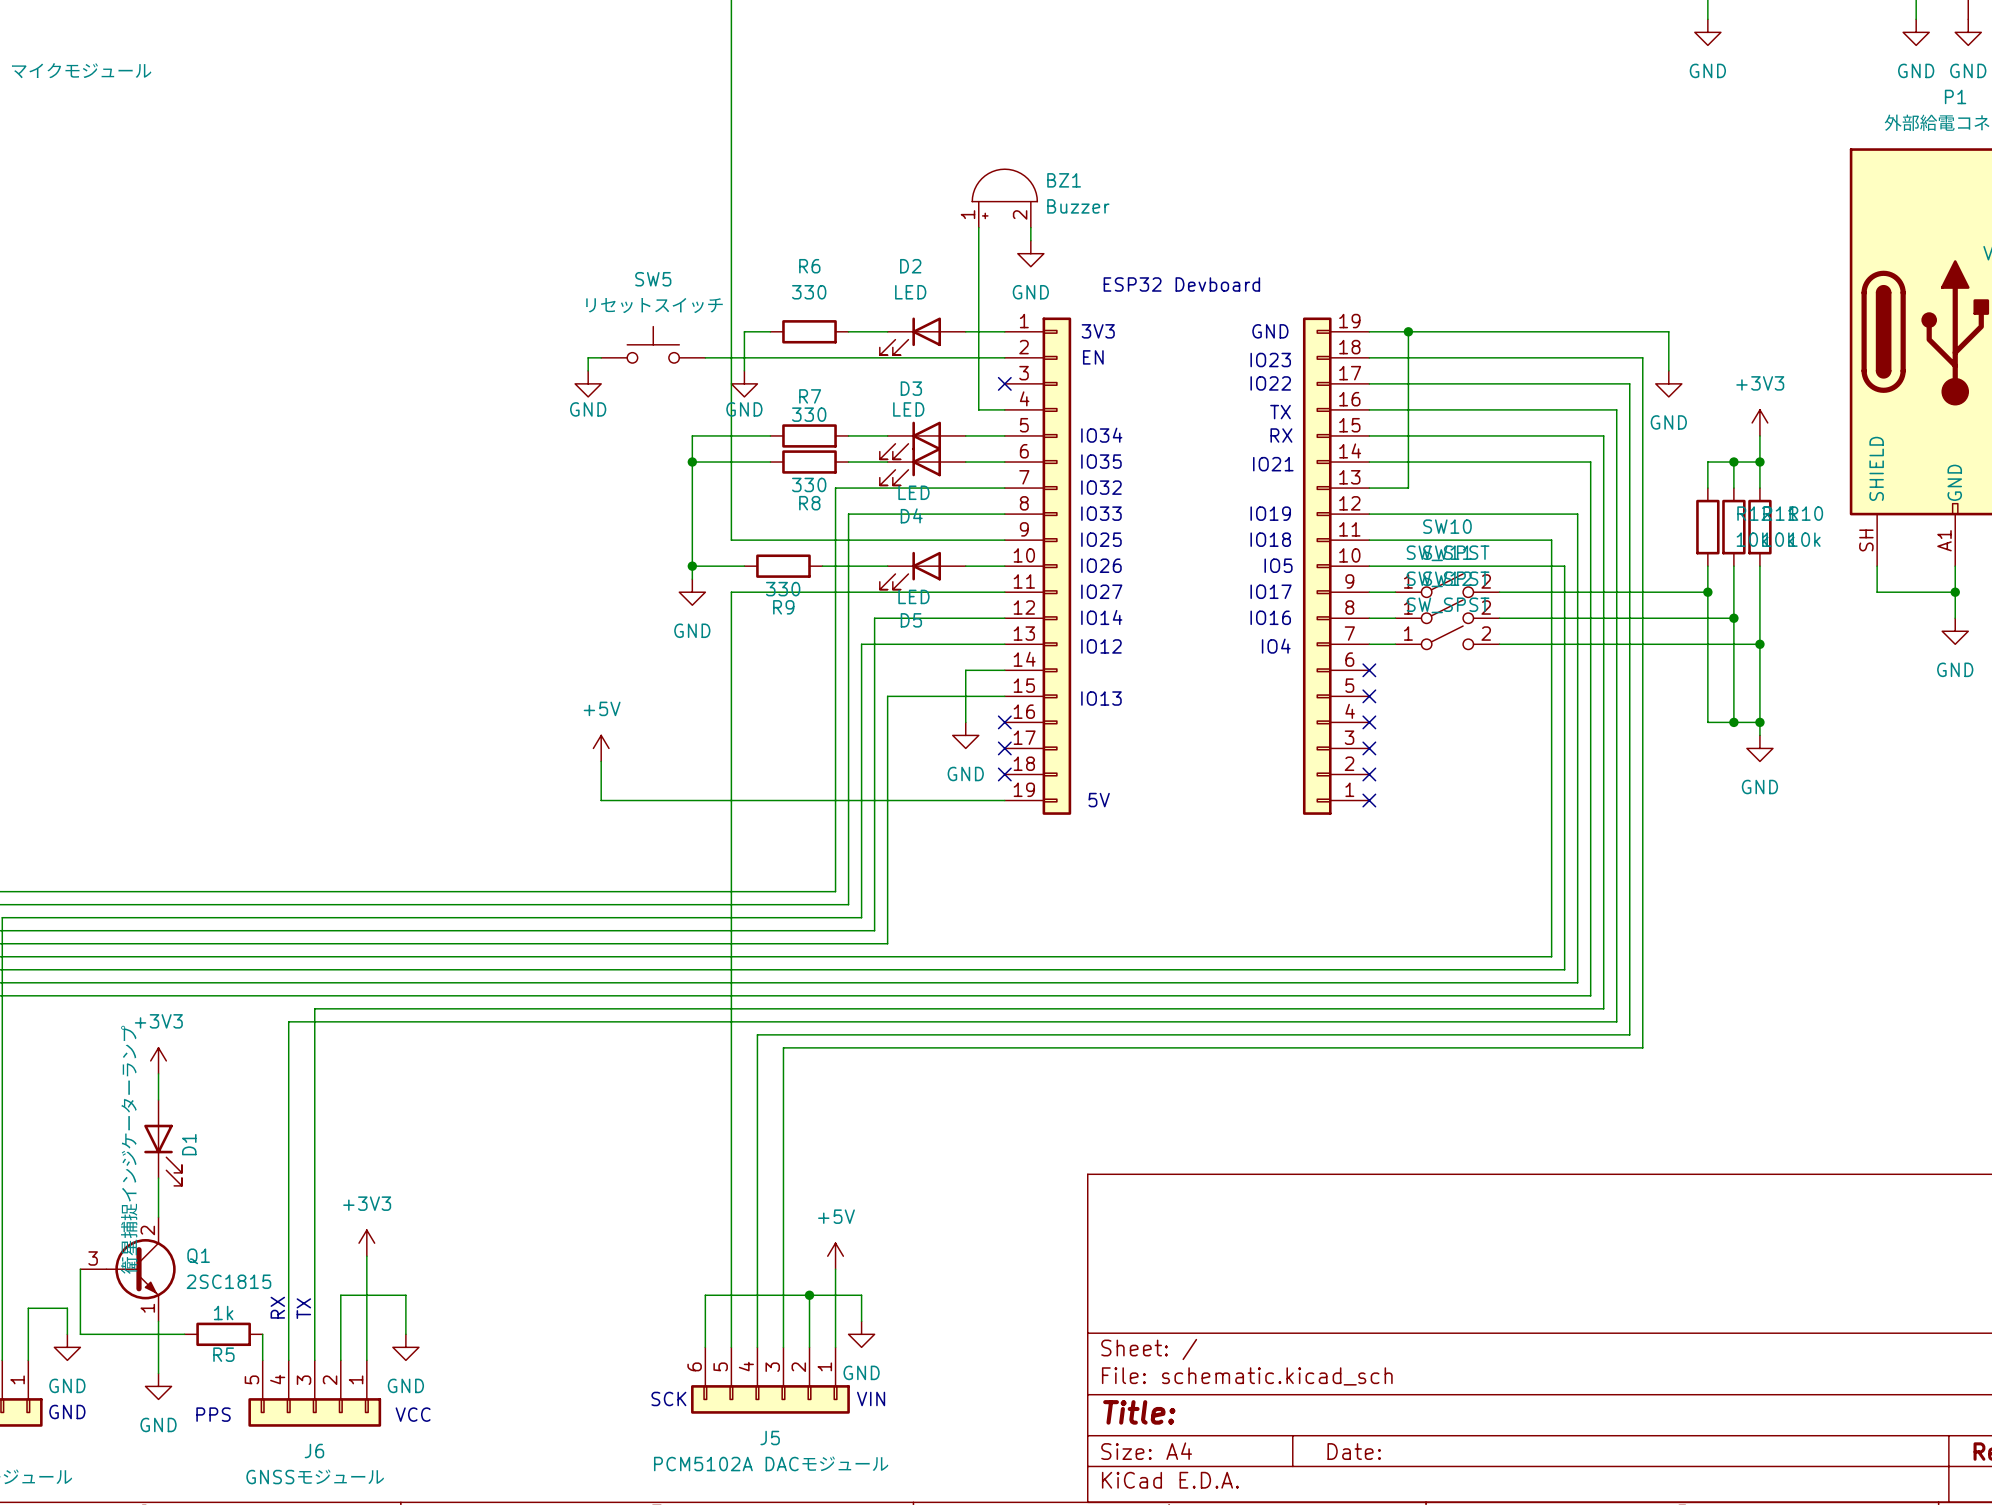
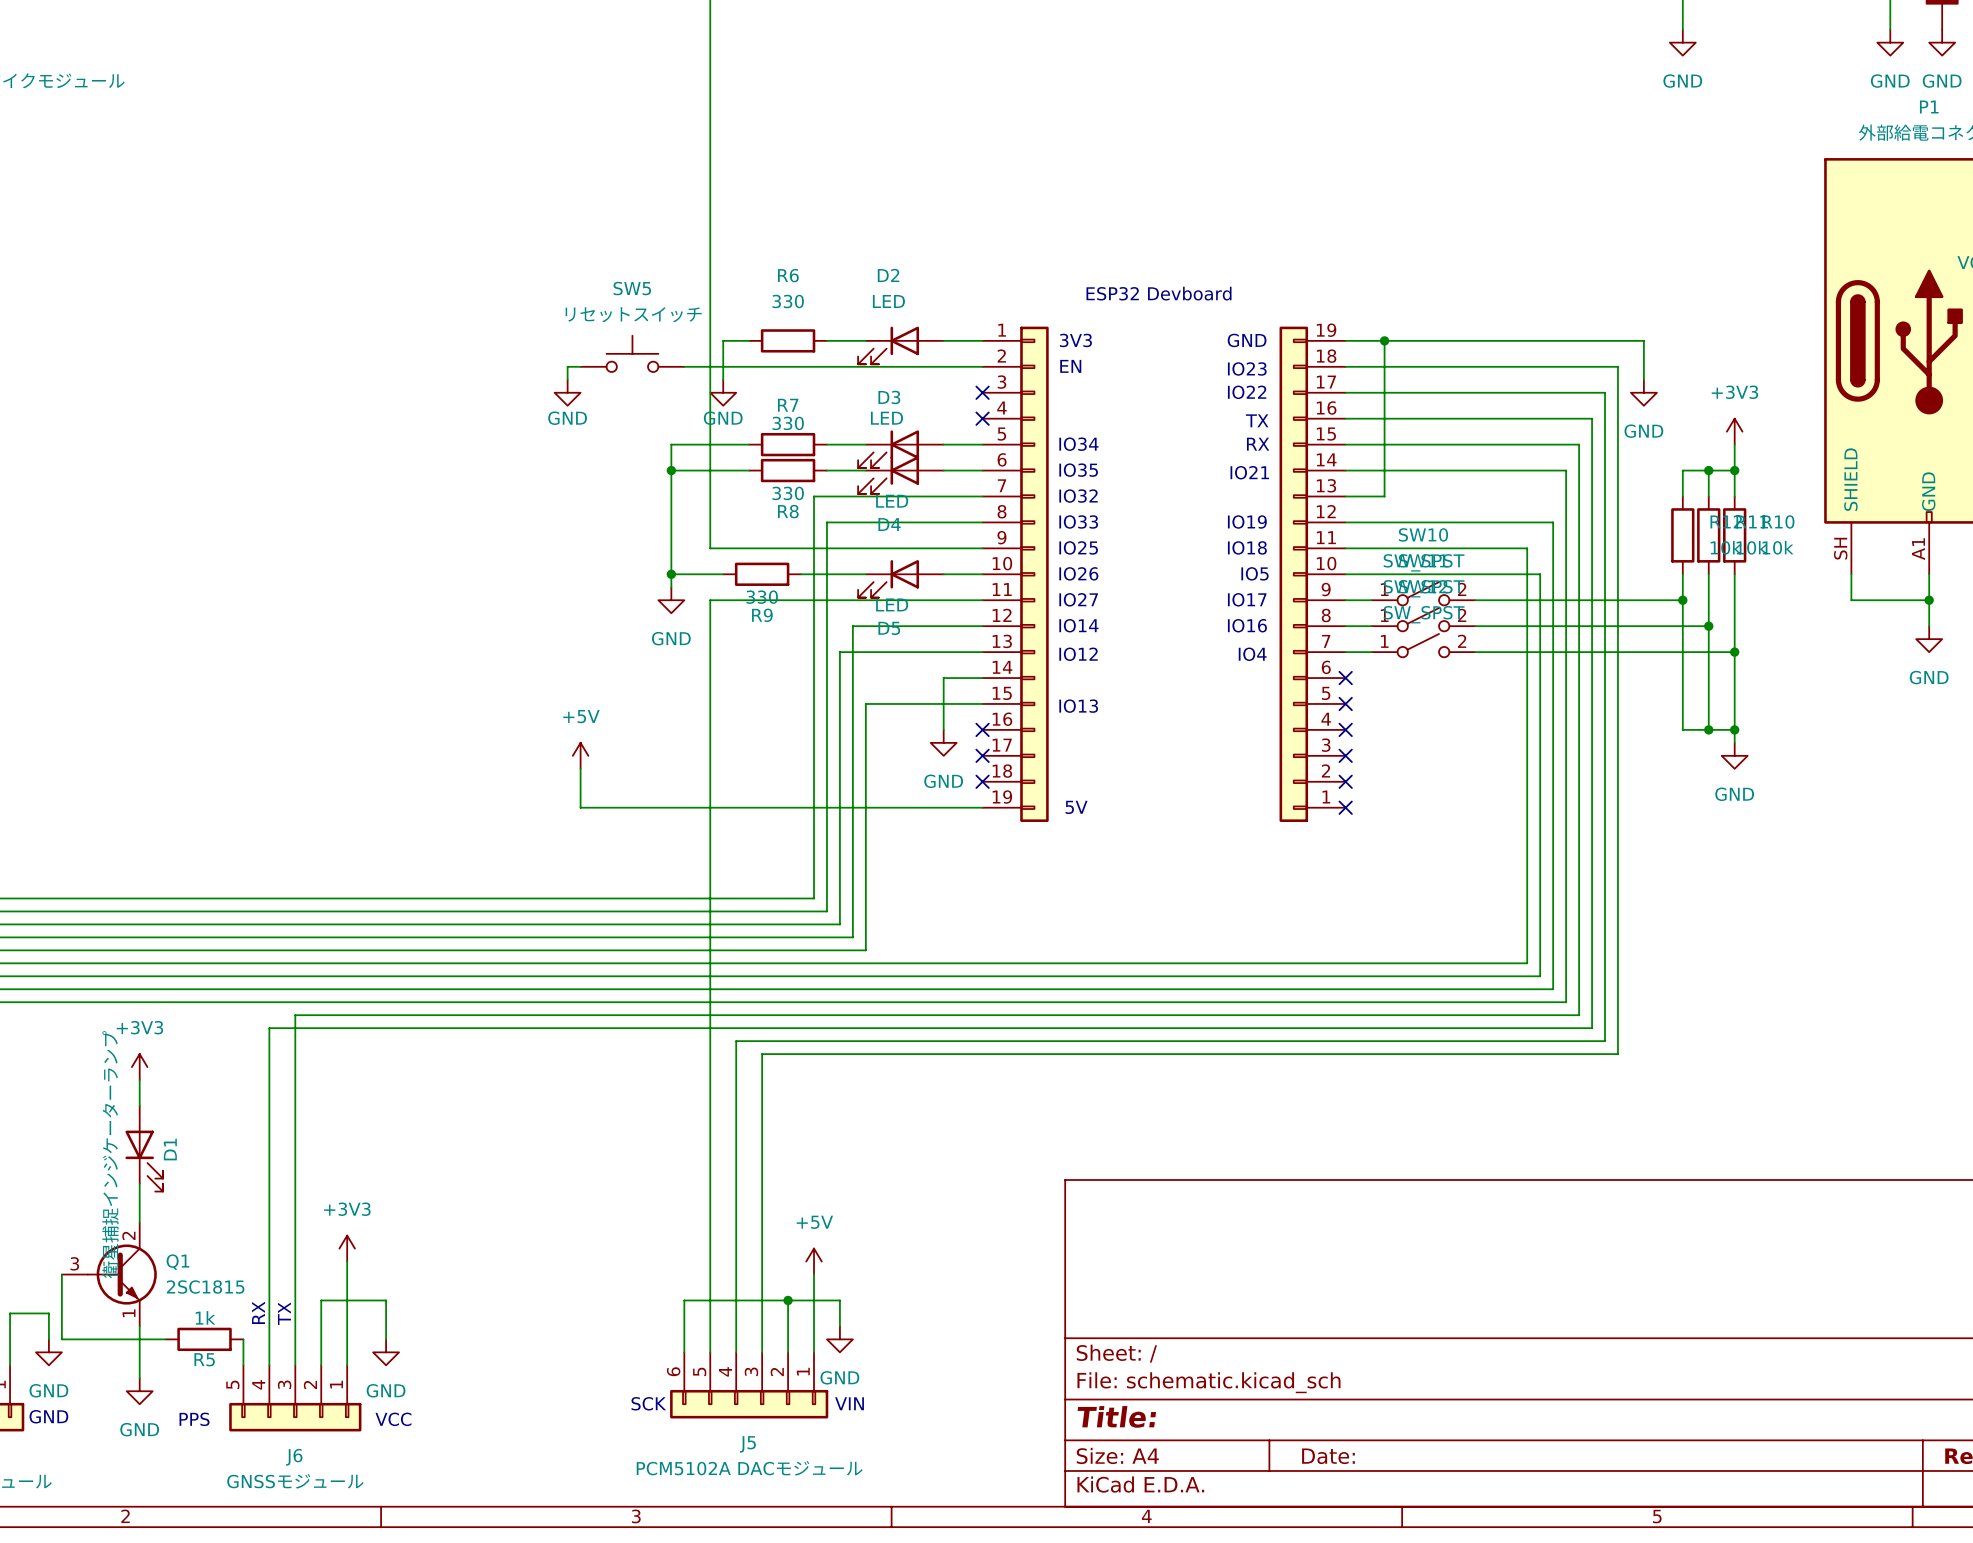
BZ1: Buzzer (1004, 198) -> none
wire: (978, 227) (978, 409) (1004, 409) -> none
wire: (1030, 227) (1030, 240) -> none
power symbol: GND (1030, 253) -> none
no-connect mark: none -> (982, 418)

